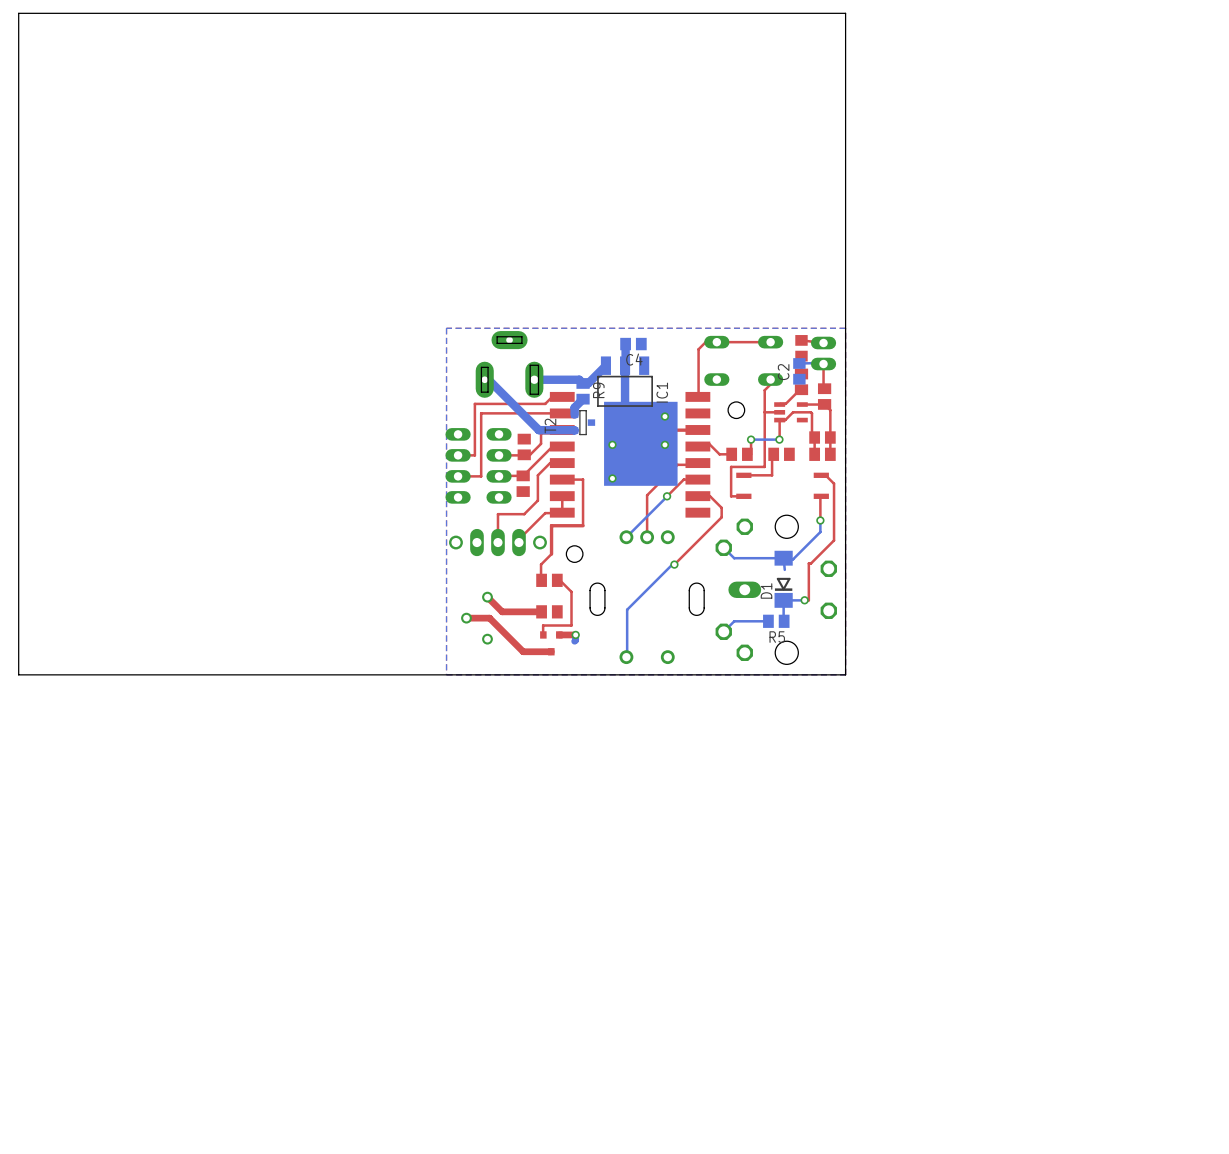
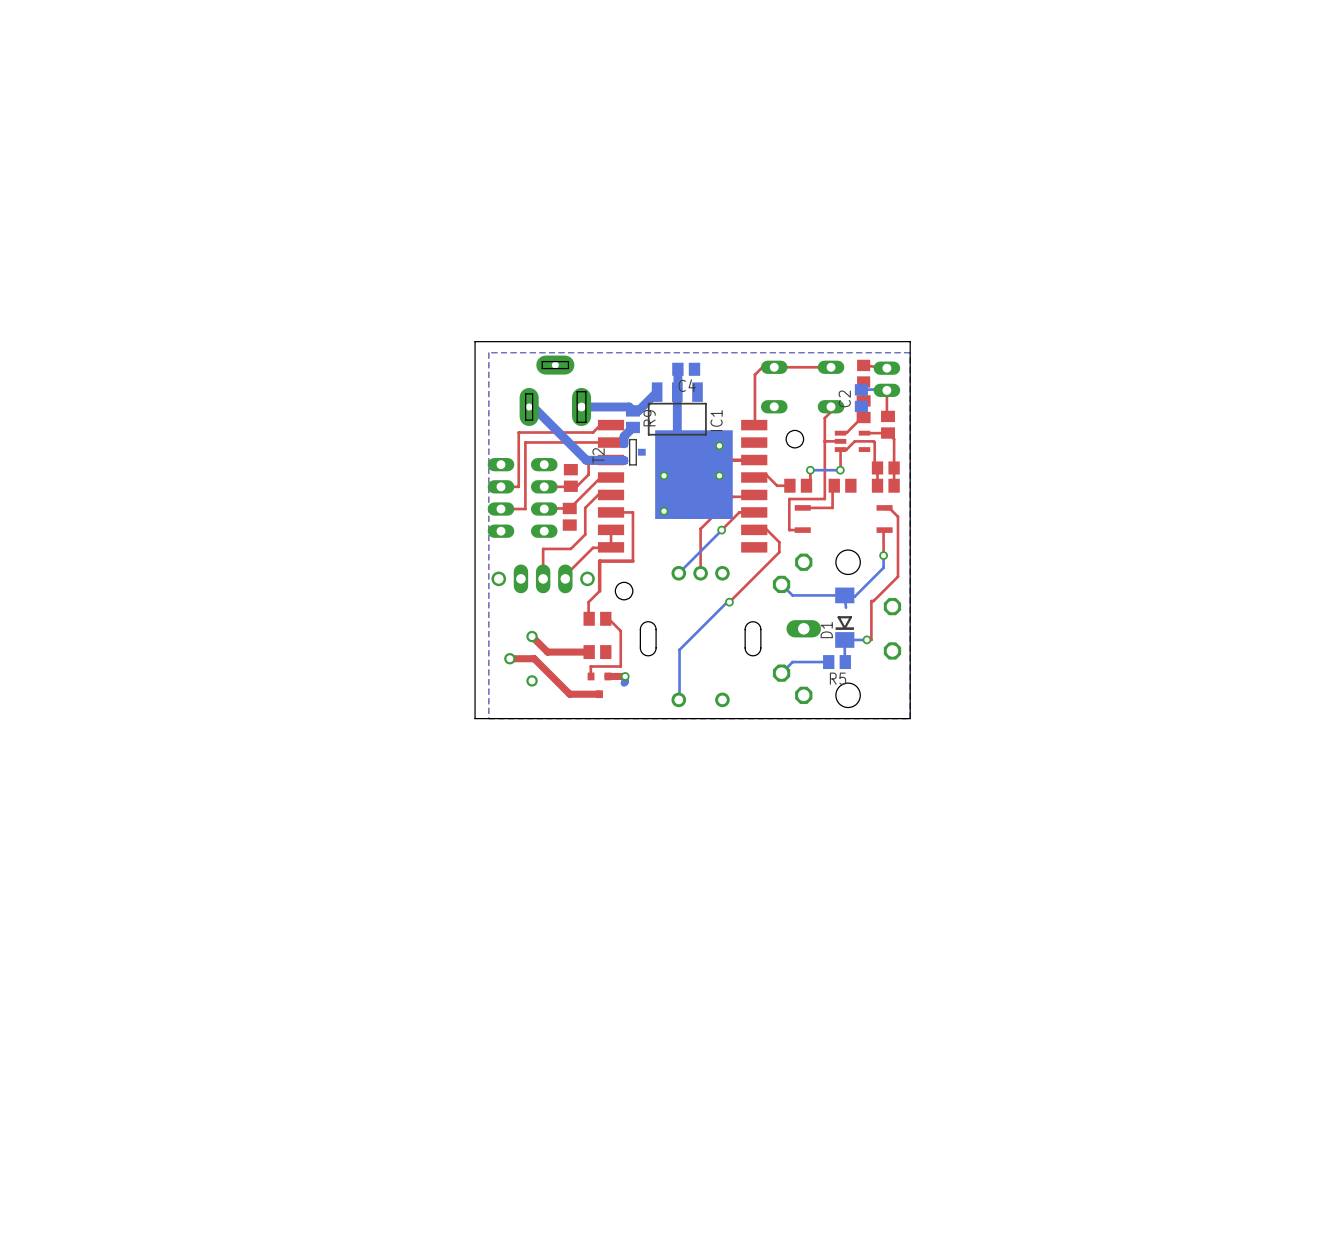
board edge: (845, 317) (845, 13) (18, 13) (18, 674) (433, 674) -> (910, 341) (475, 341) (475, 718)

